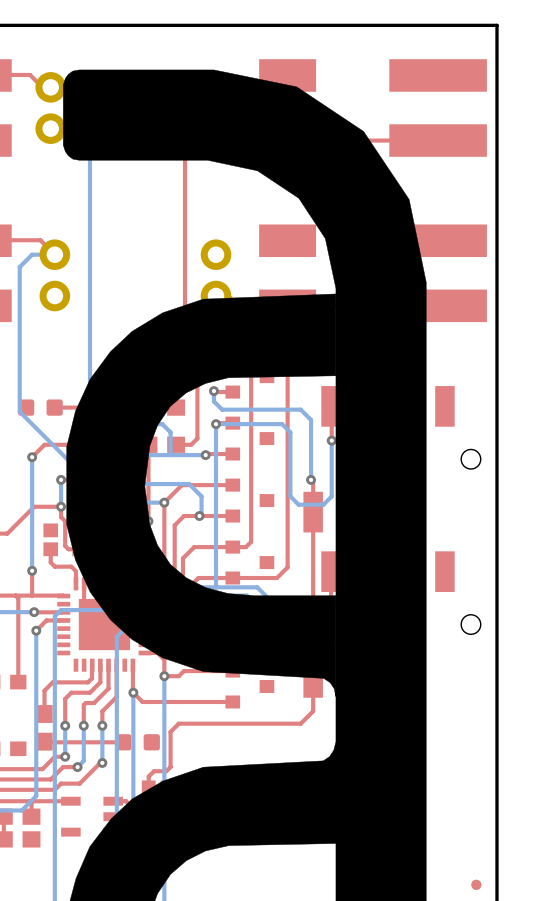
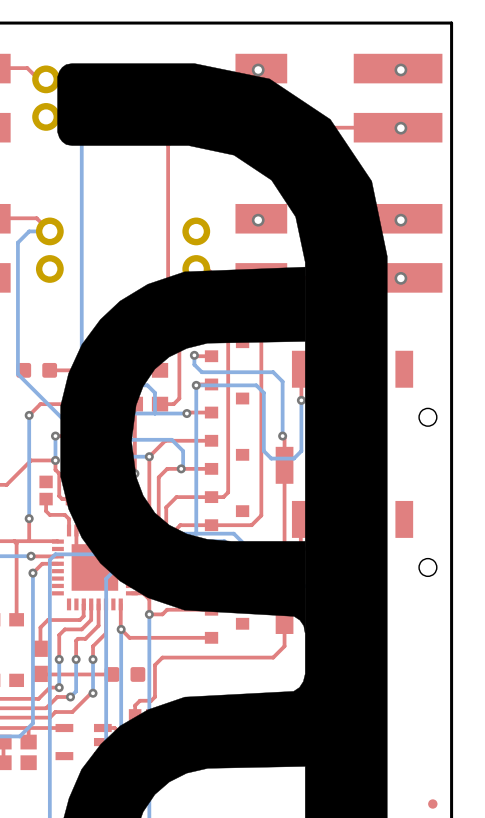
via: none -> (258, 69)
via: none -> (400, 69)
via: none -> (400, 128)
via: none -> (258, 220)
via: none -> (400, 220)
via: none -> (400, 278)

